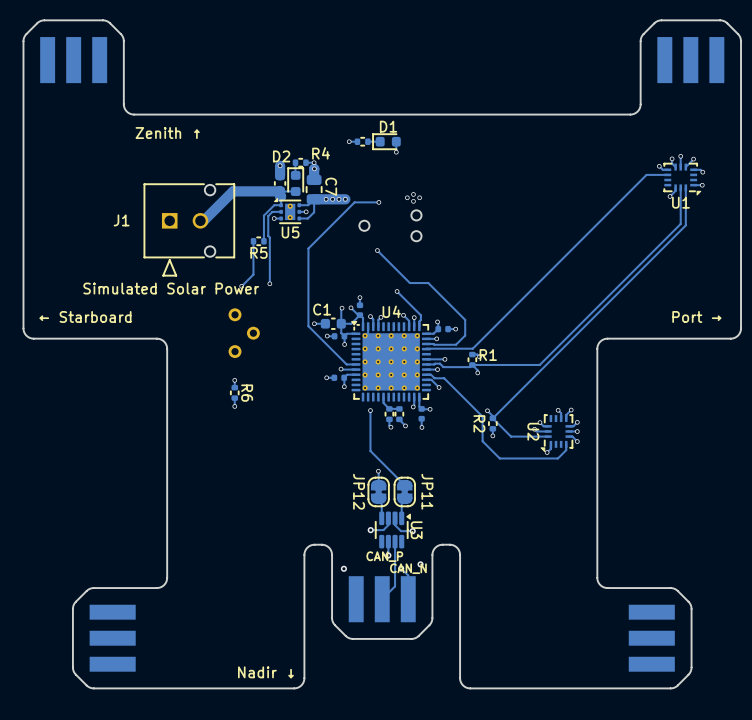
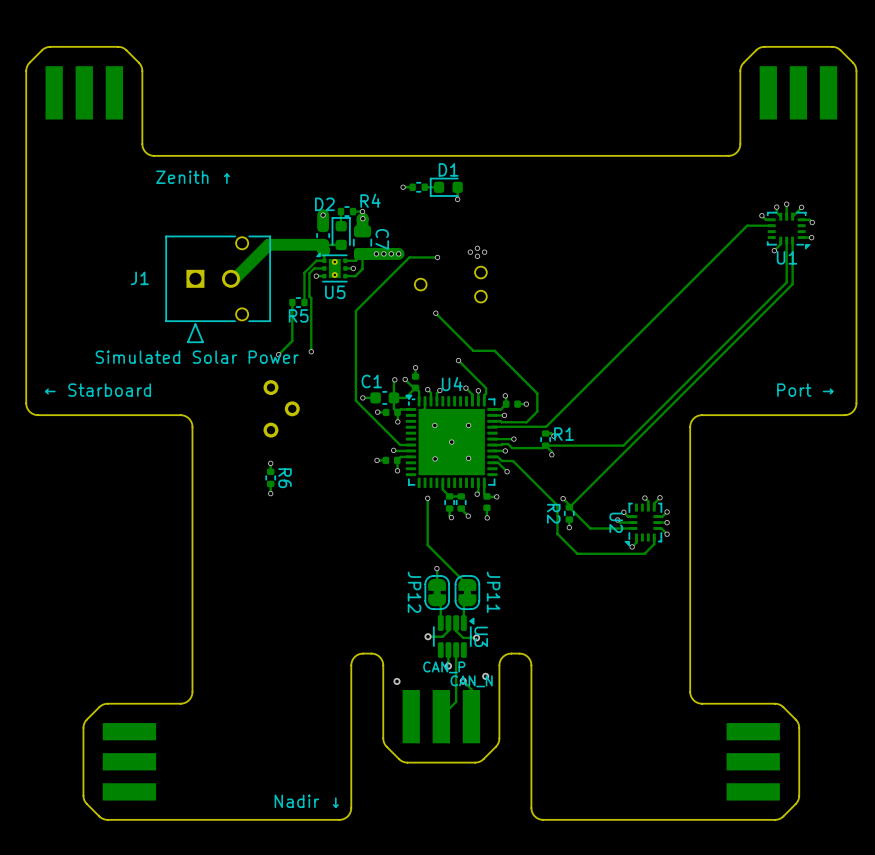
U4 footprint: [351, 320, 431, 402] -> [405, 394, 498, 488]
via: none -> (434, 425)
via: none -> (468, 425)
via: none -> (451, 442)
via: none -> (468, 458)
via: none -> (435, 458)

